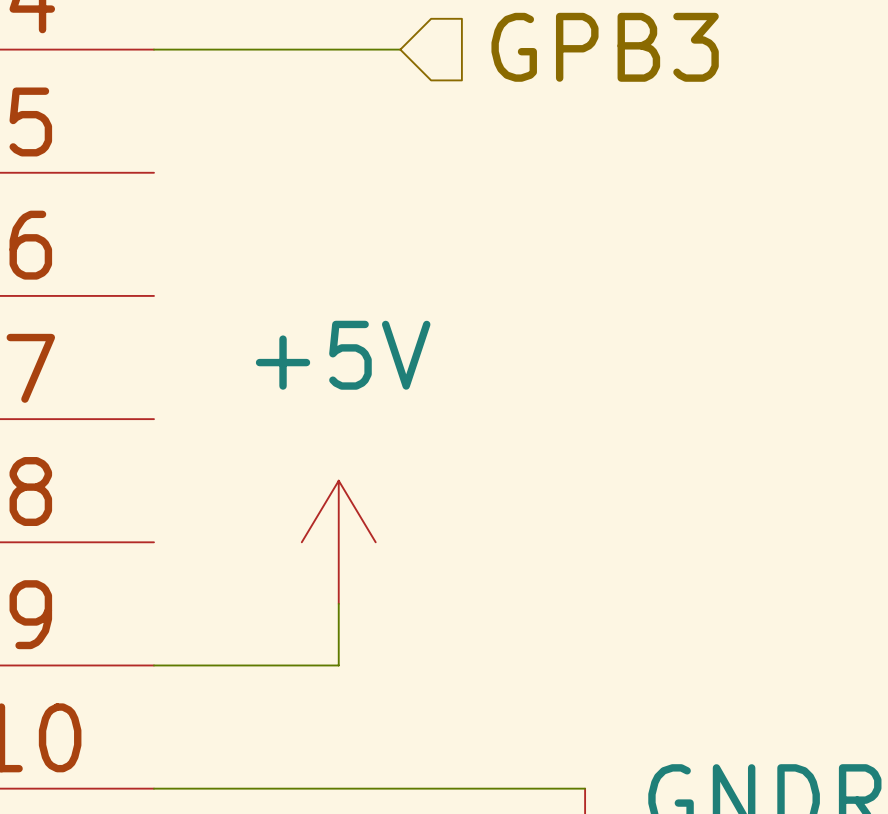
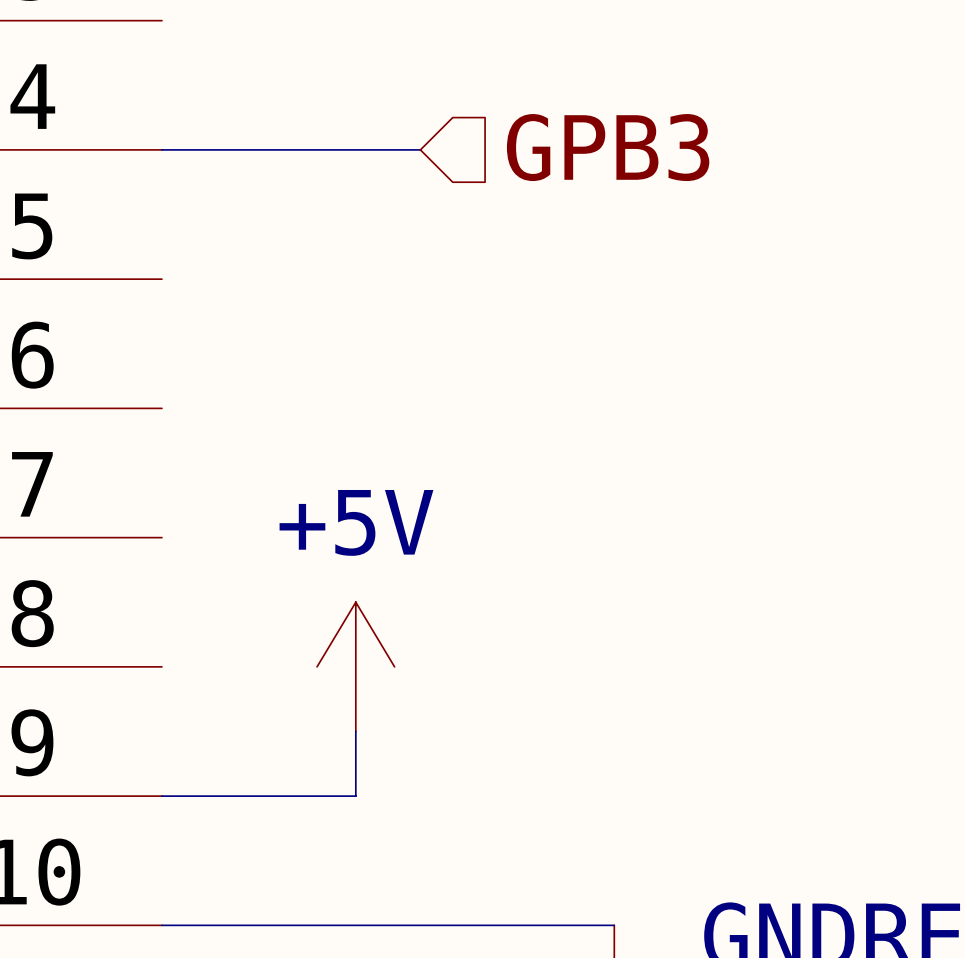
power symbol text position: +5V (343, 355) -> +5V (356, 522)

